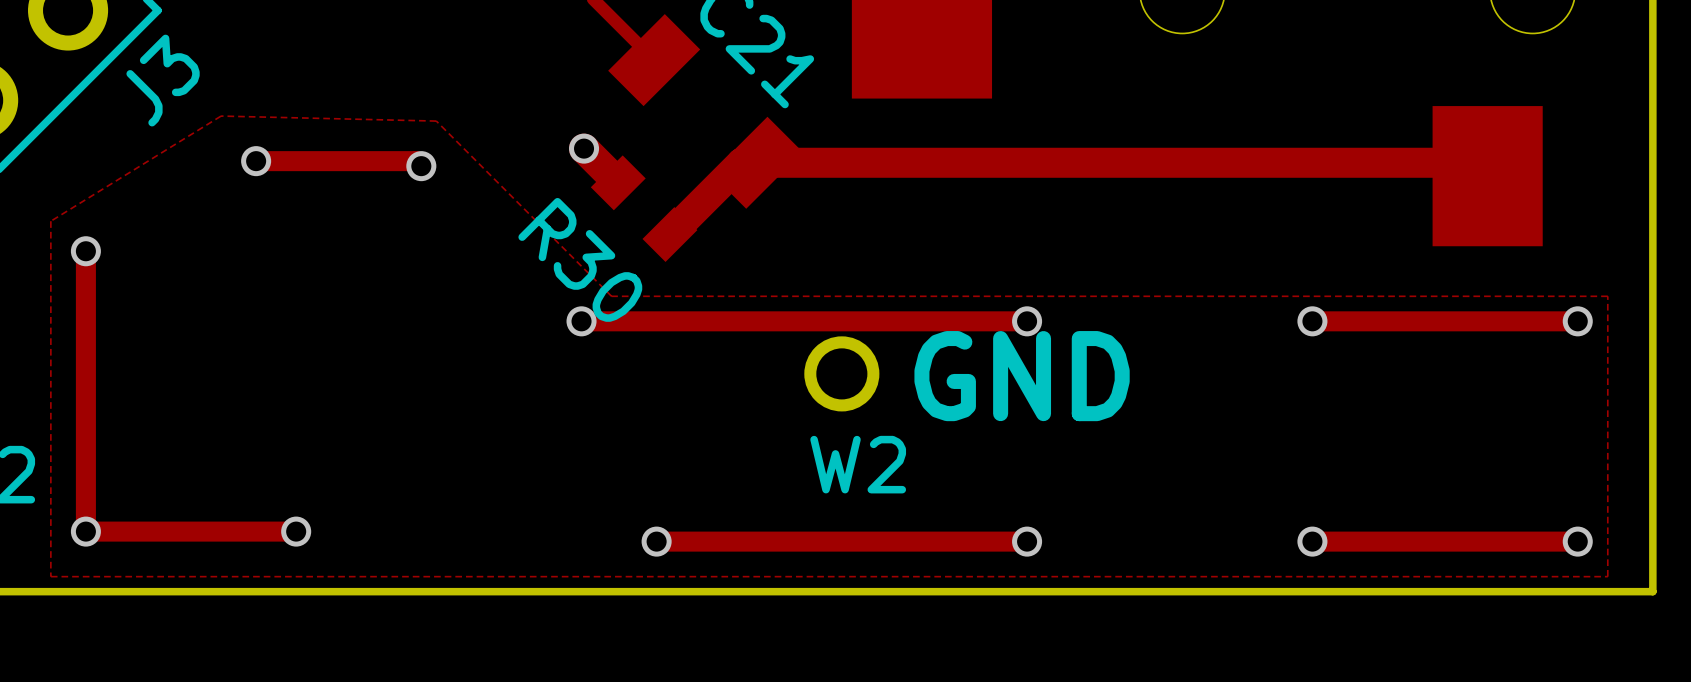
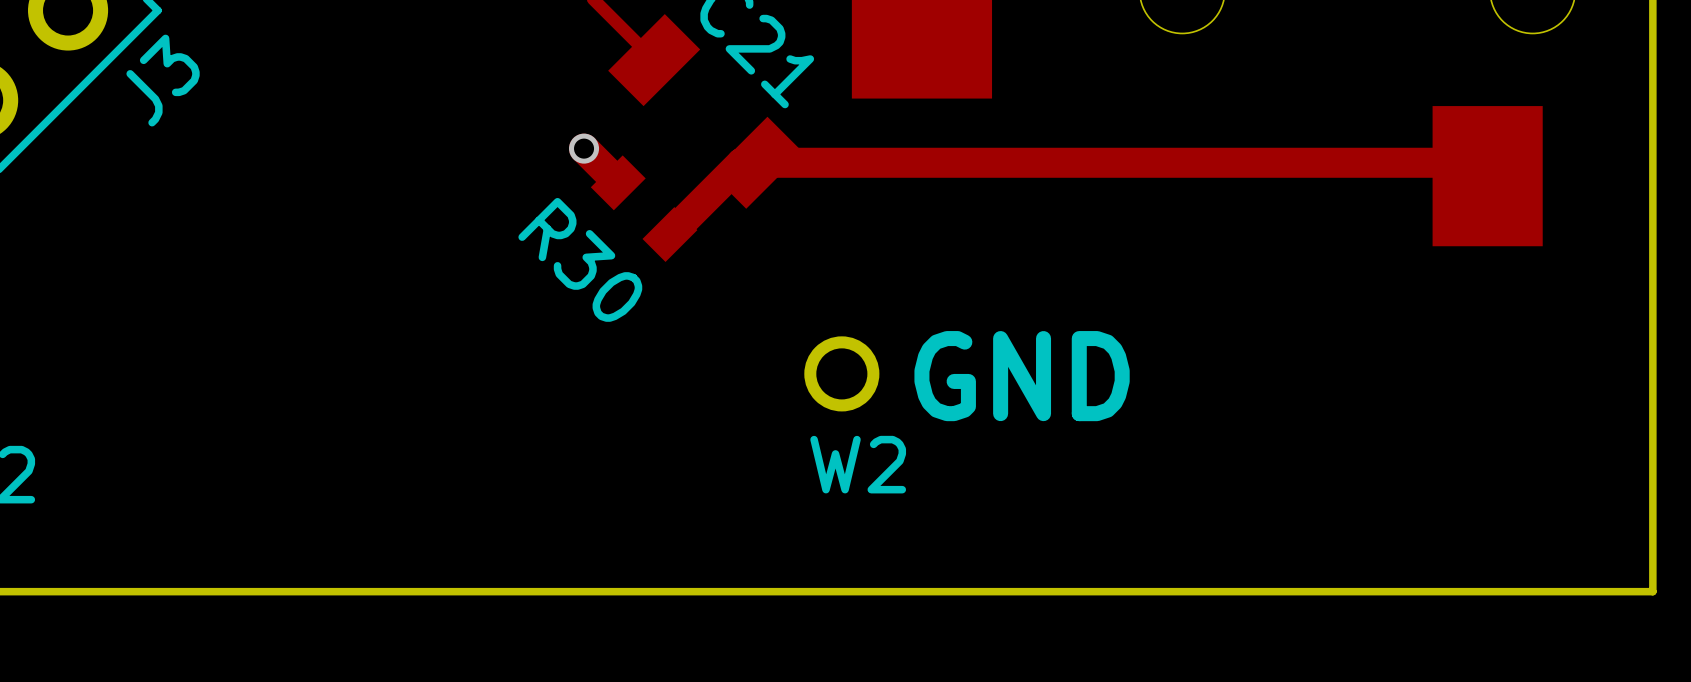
zone outline: (221, 116) (436, 121) (611, 296) (1607, 296) (1607, 576) (50, 576) (50, 221) (221, 116) -> none
track: (256, 161) (416, 161) (421, 166) -> none
via: (256, 161) -> none
via: (421, 166) -> none
track: (85, 251) (85, 531) (296, 531) -> none
via: (85, 251) -> none
track: (581, 321) (1027, 321) -> none
via: (581, 321) -> none
via: (1027, 321) -> none
track: (1312, 321) (1577, 321) -> none
via: (1312, 321) -> none
via: (1577, 321) -> none
via: (85, 531) -> none
via: (296, 531) -> none
track: (656, 541) (1027, 541) -> none
via: (656, 541) -> none
via: (1027, 541) -> none
track: (1312, 541) (1577, 541) -> none
via: (1312, 541) -> none
via: (1577, 541) -> none

